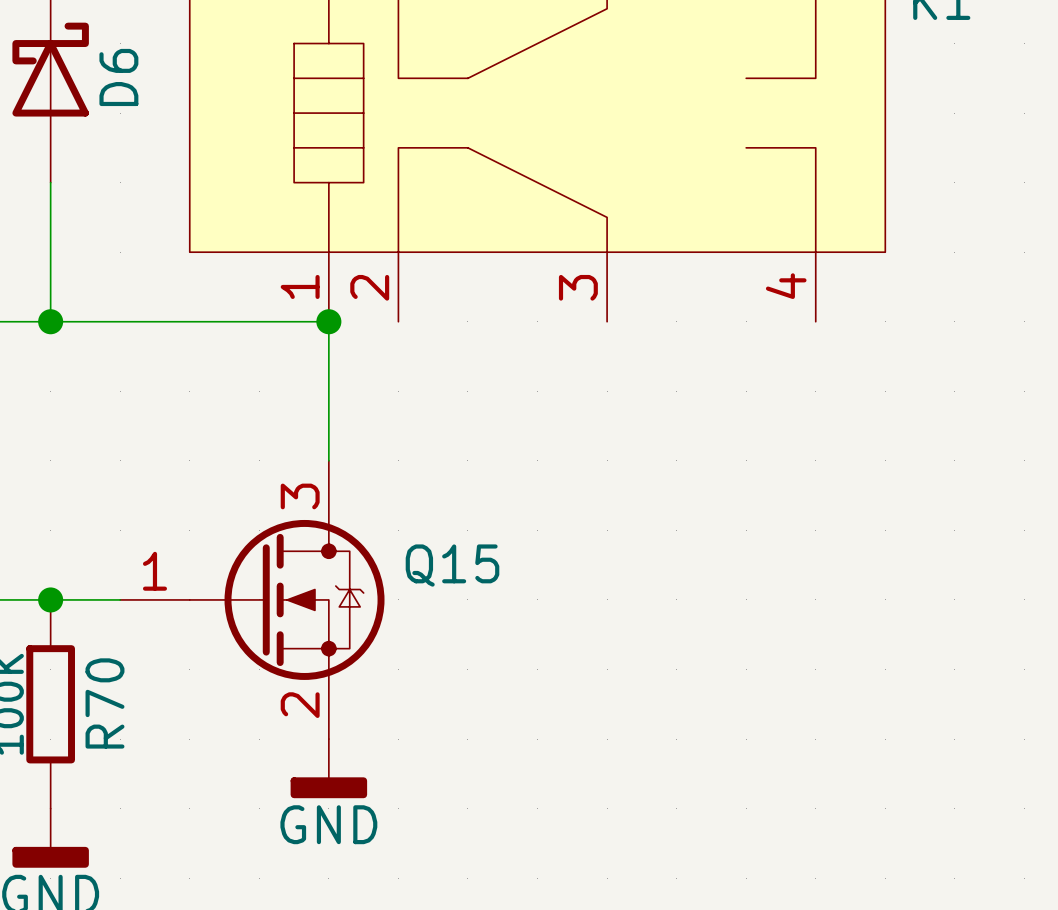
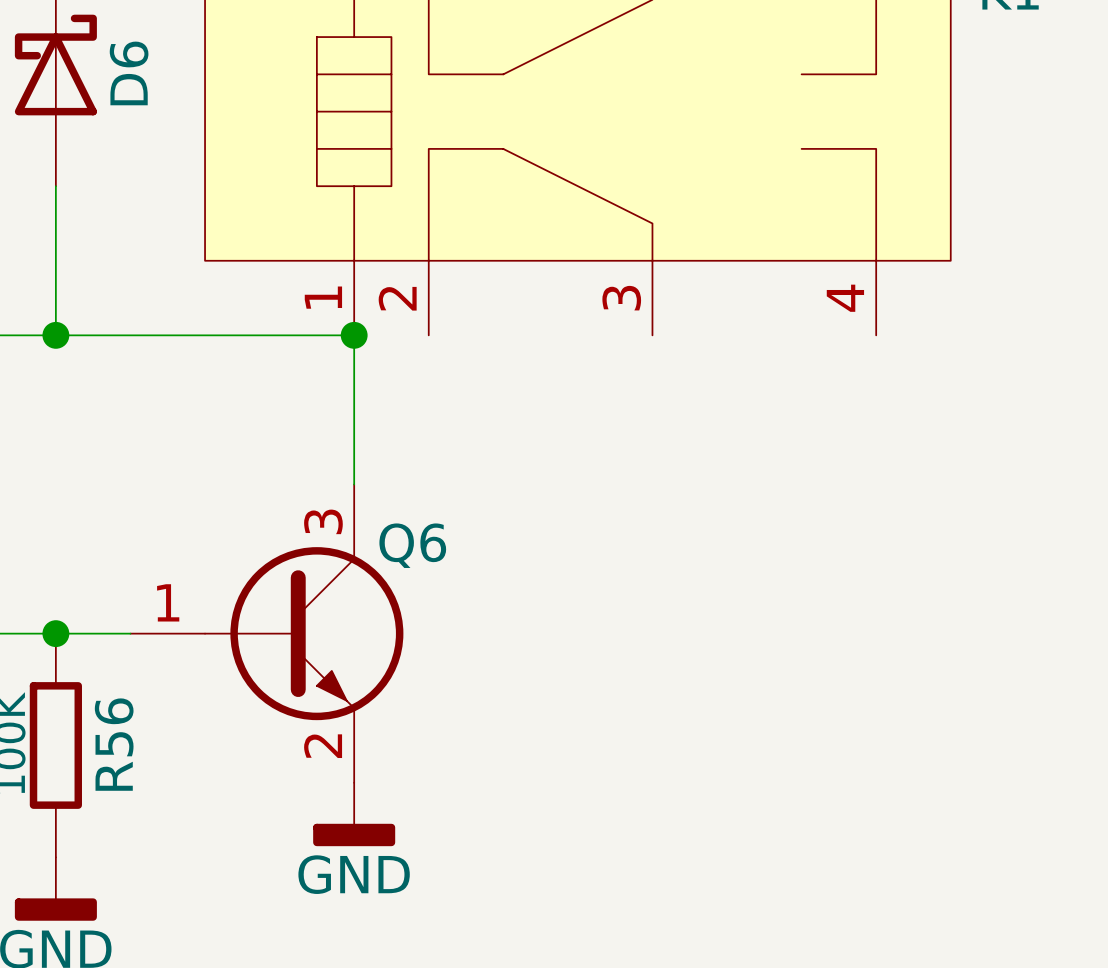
Q6: none -> (266, 633)
Q15: (252, 599) -> none
R70 name: R70 (104, 703) -> R56 (114, 744)

